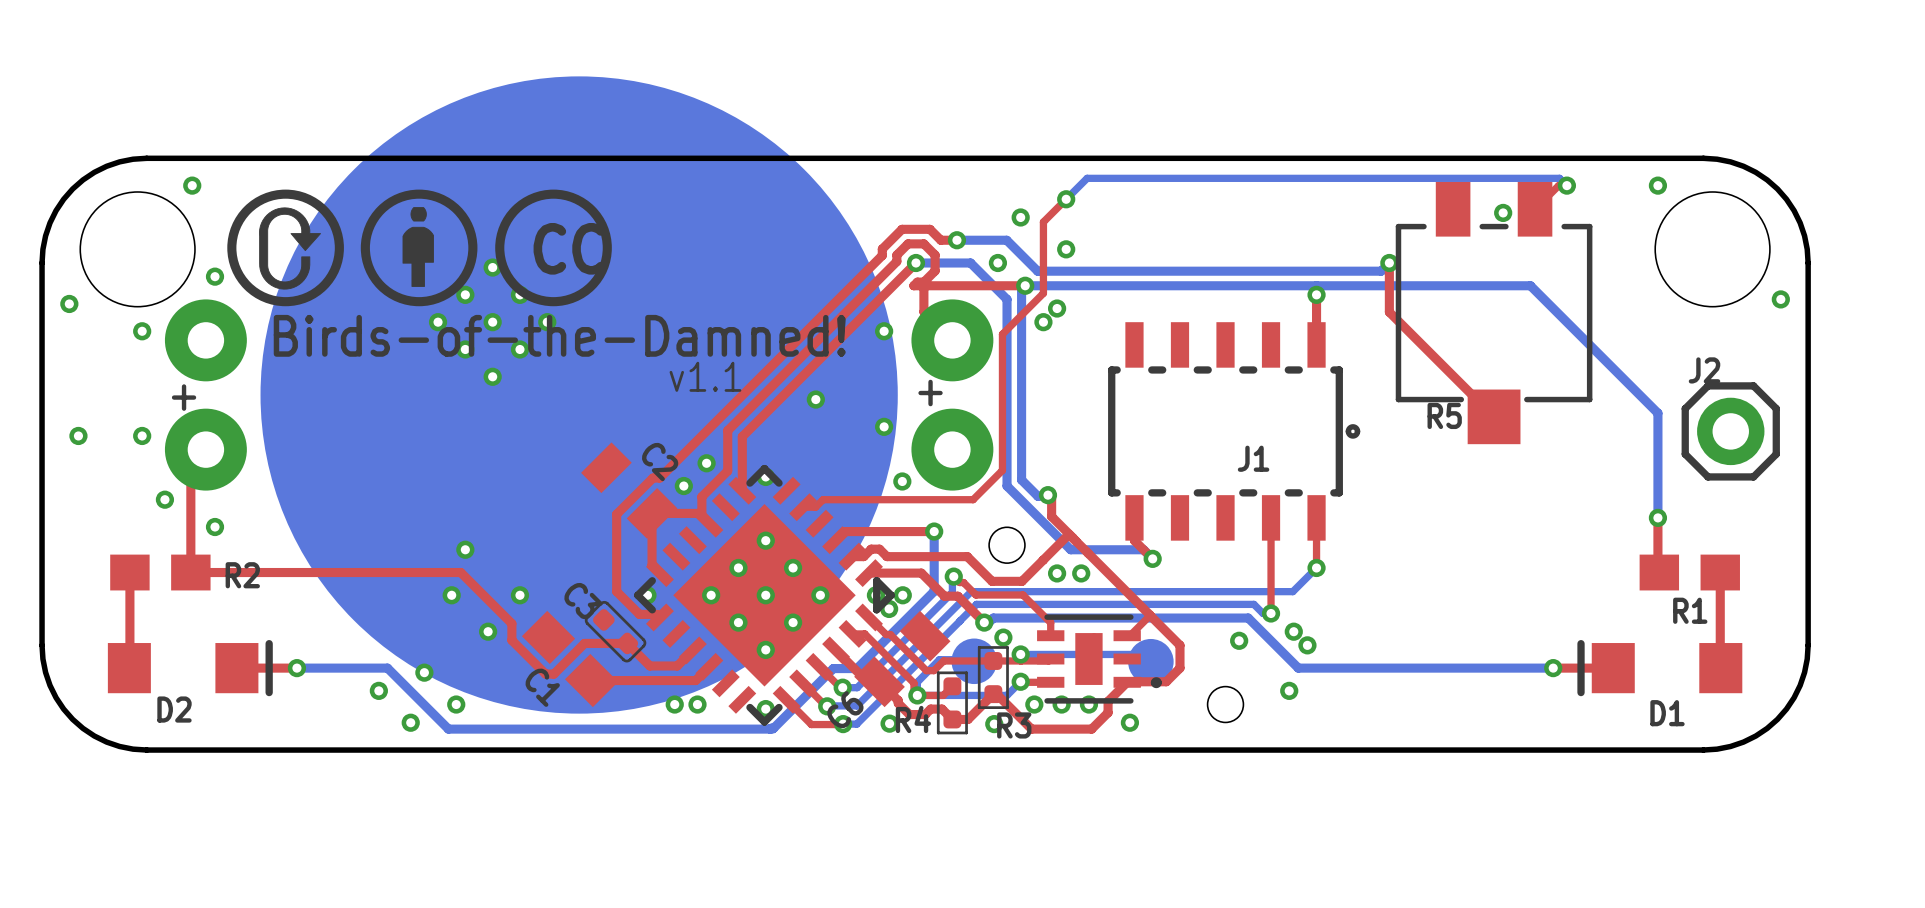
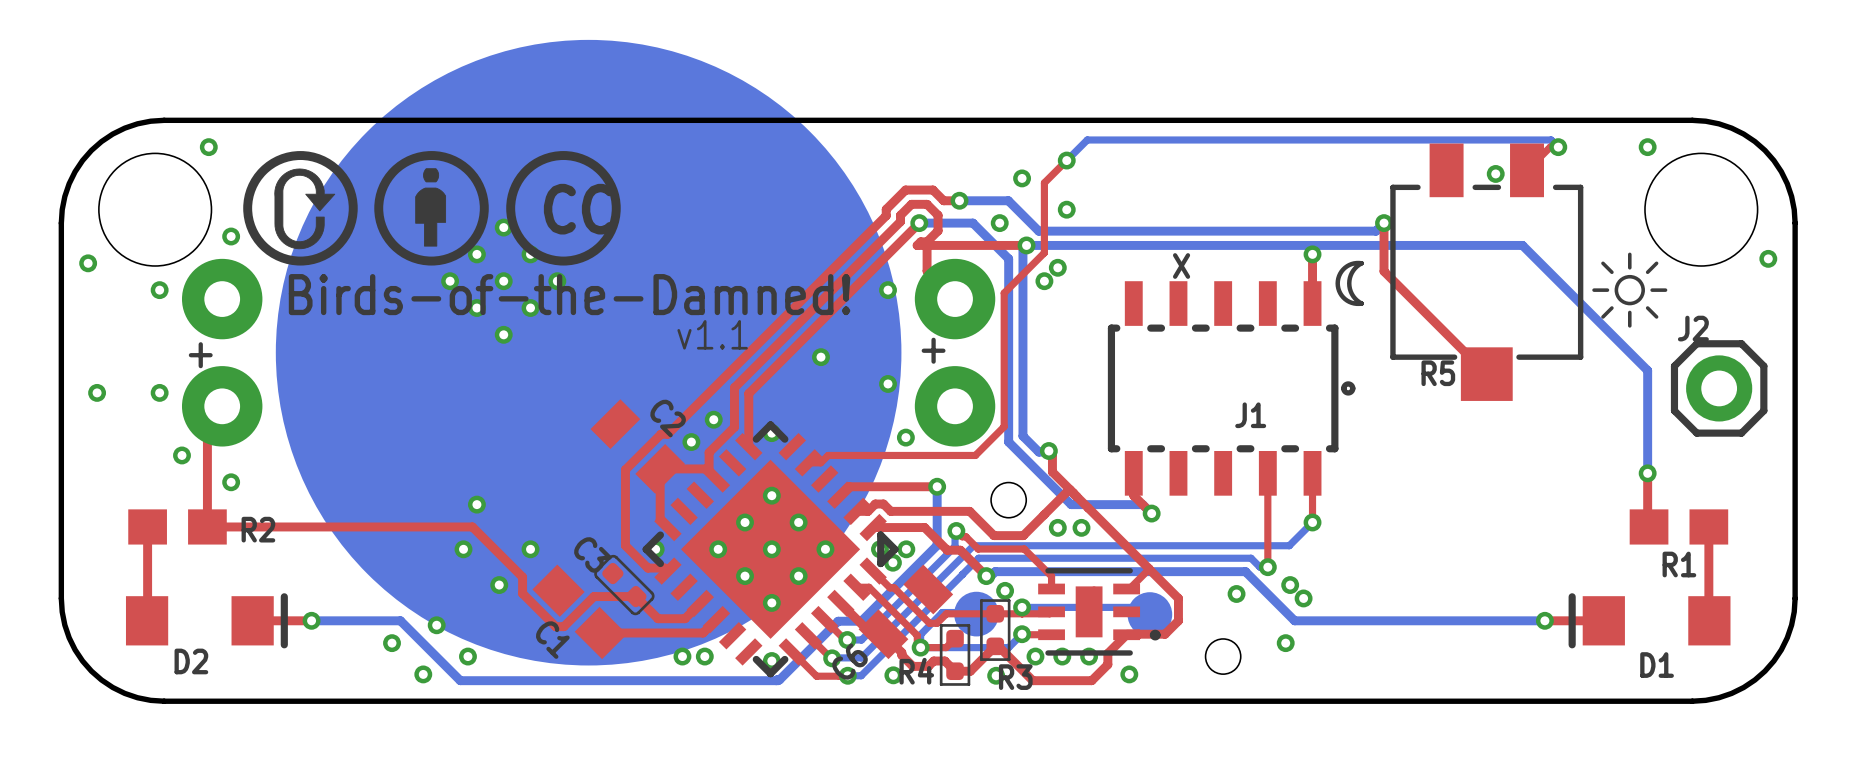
line: none -> (1629, 254) (1629, 267)
line: none -> (1361, 263) (1347, 266) (1341, 271) (1337, 280) (1341, 295) (1354, 303) (1361, 303) (1355, 298) (1350, 291) (1349, 277) (1353, 270) (1361, 263)
line: none -> (1602, 263) (1611, 272)
line: none -> (1656, 263) (1647, 272)
text: none -> X (1181, 266)
drawing: none -> [1614, 274, 1645, 306]
line: none -> (1594, 290) (1607, 290)
line: none -> (1652, 290) (1665, 290)
line: none -> (1611, 308) (1602, 316)
line: none -> (1647, 308) (1656, 316)
line: none -> (1629, 312) (1629, 325)

